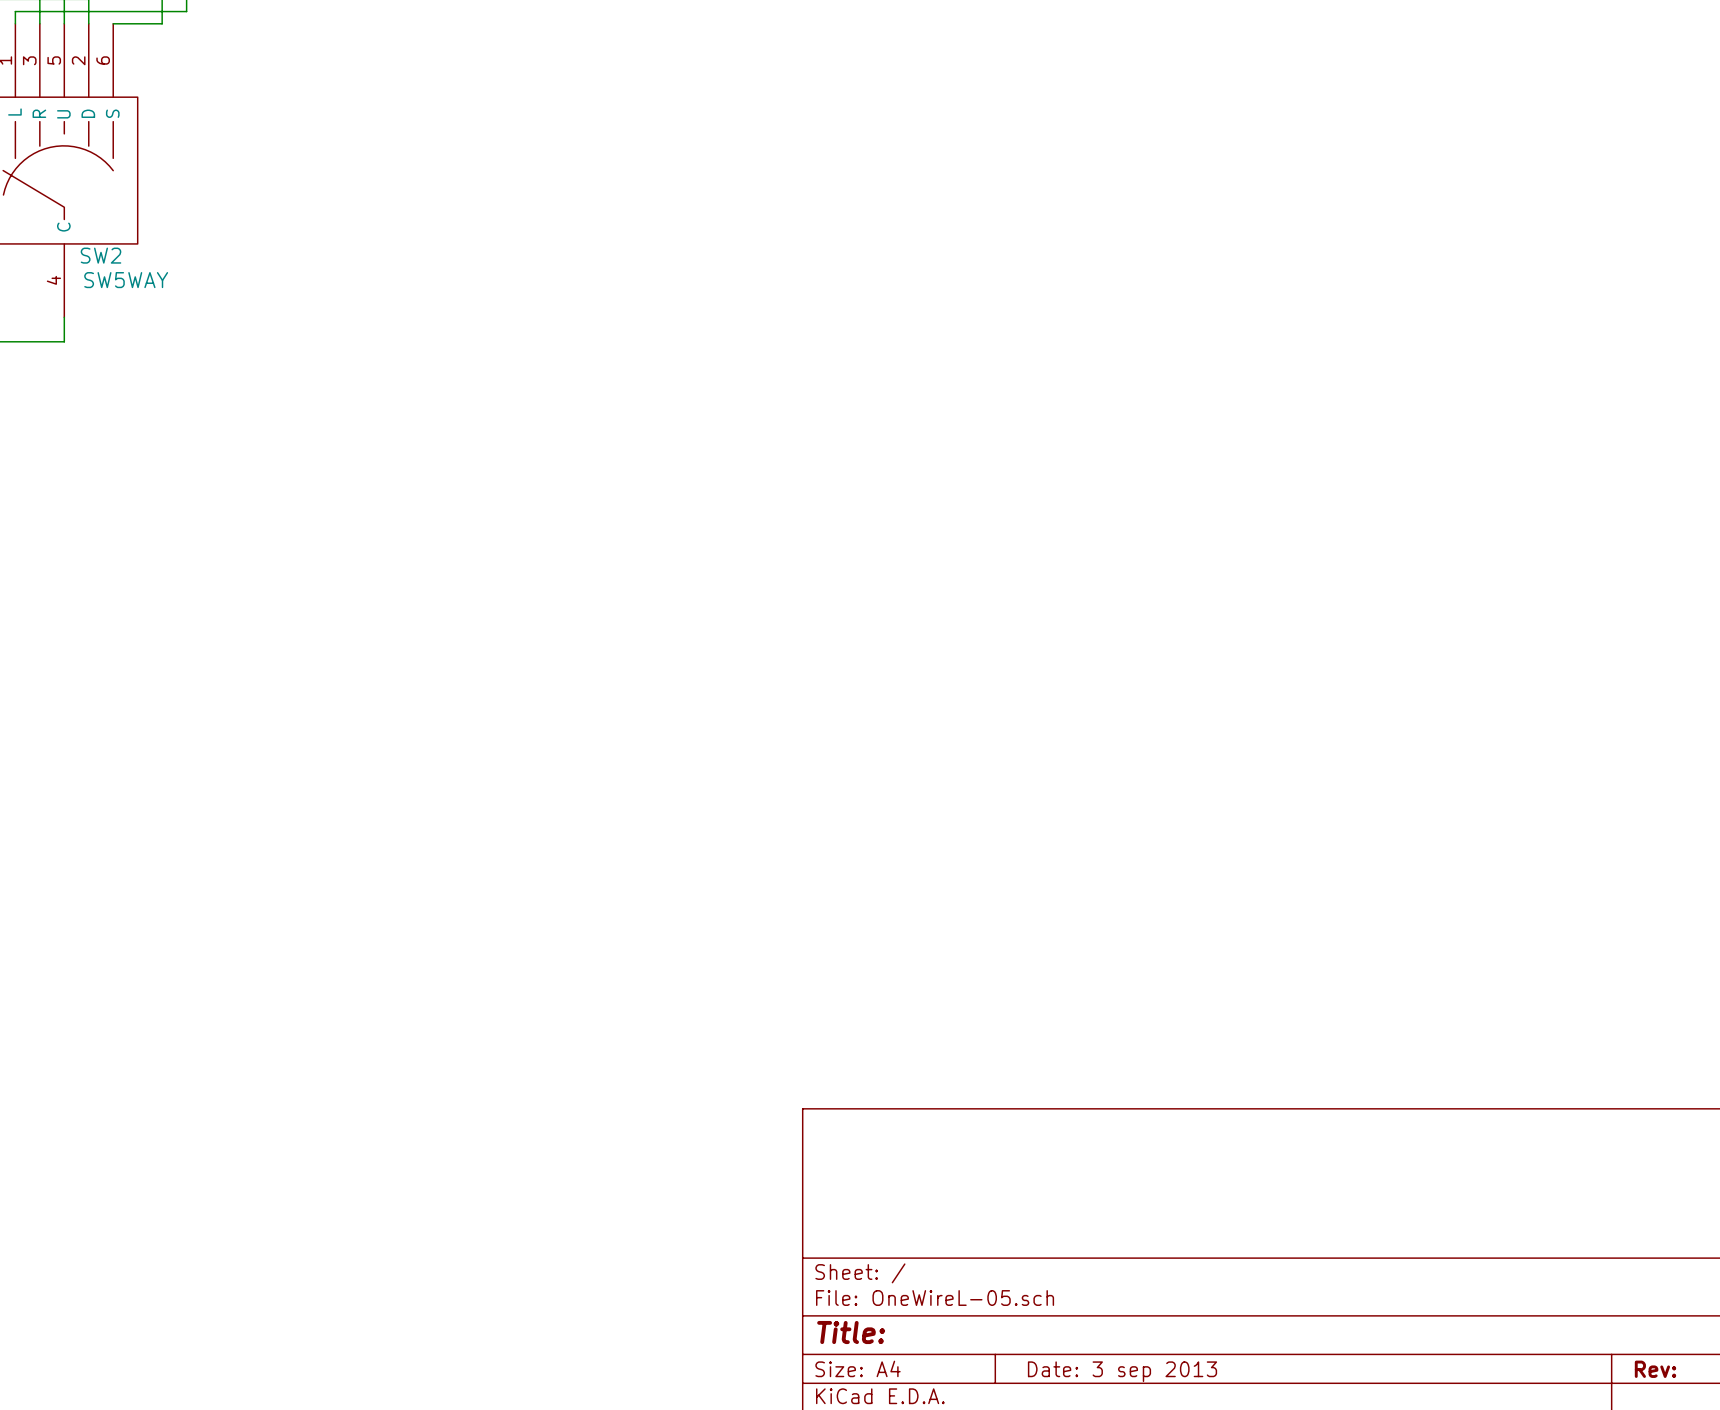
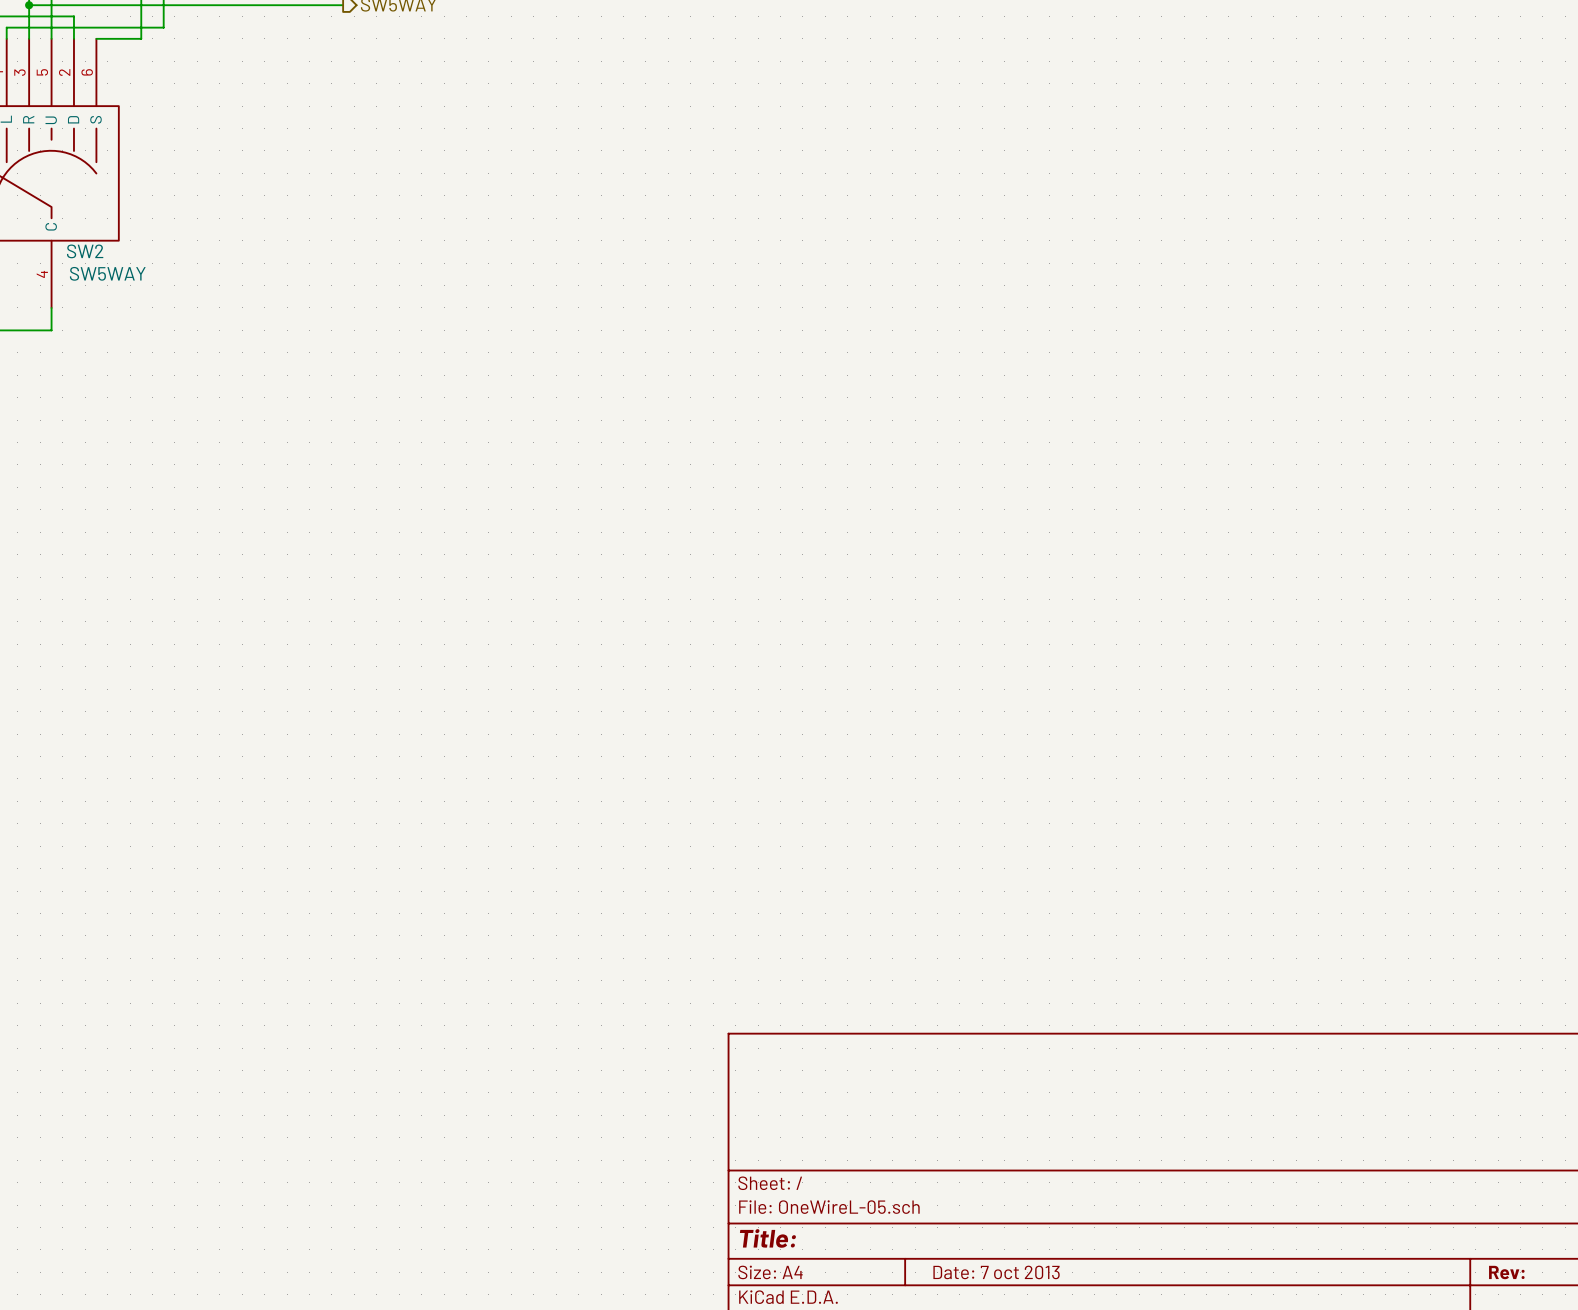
title block: Date: 3 sep 2013 (1122, 1371) -> Date: 7 oct 2013 (996, 1272)

